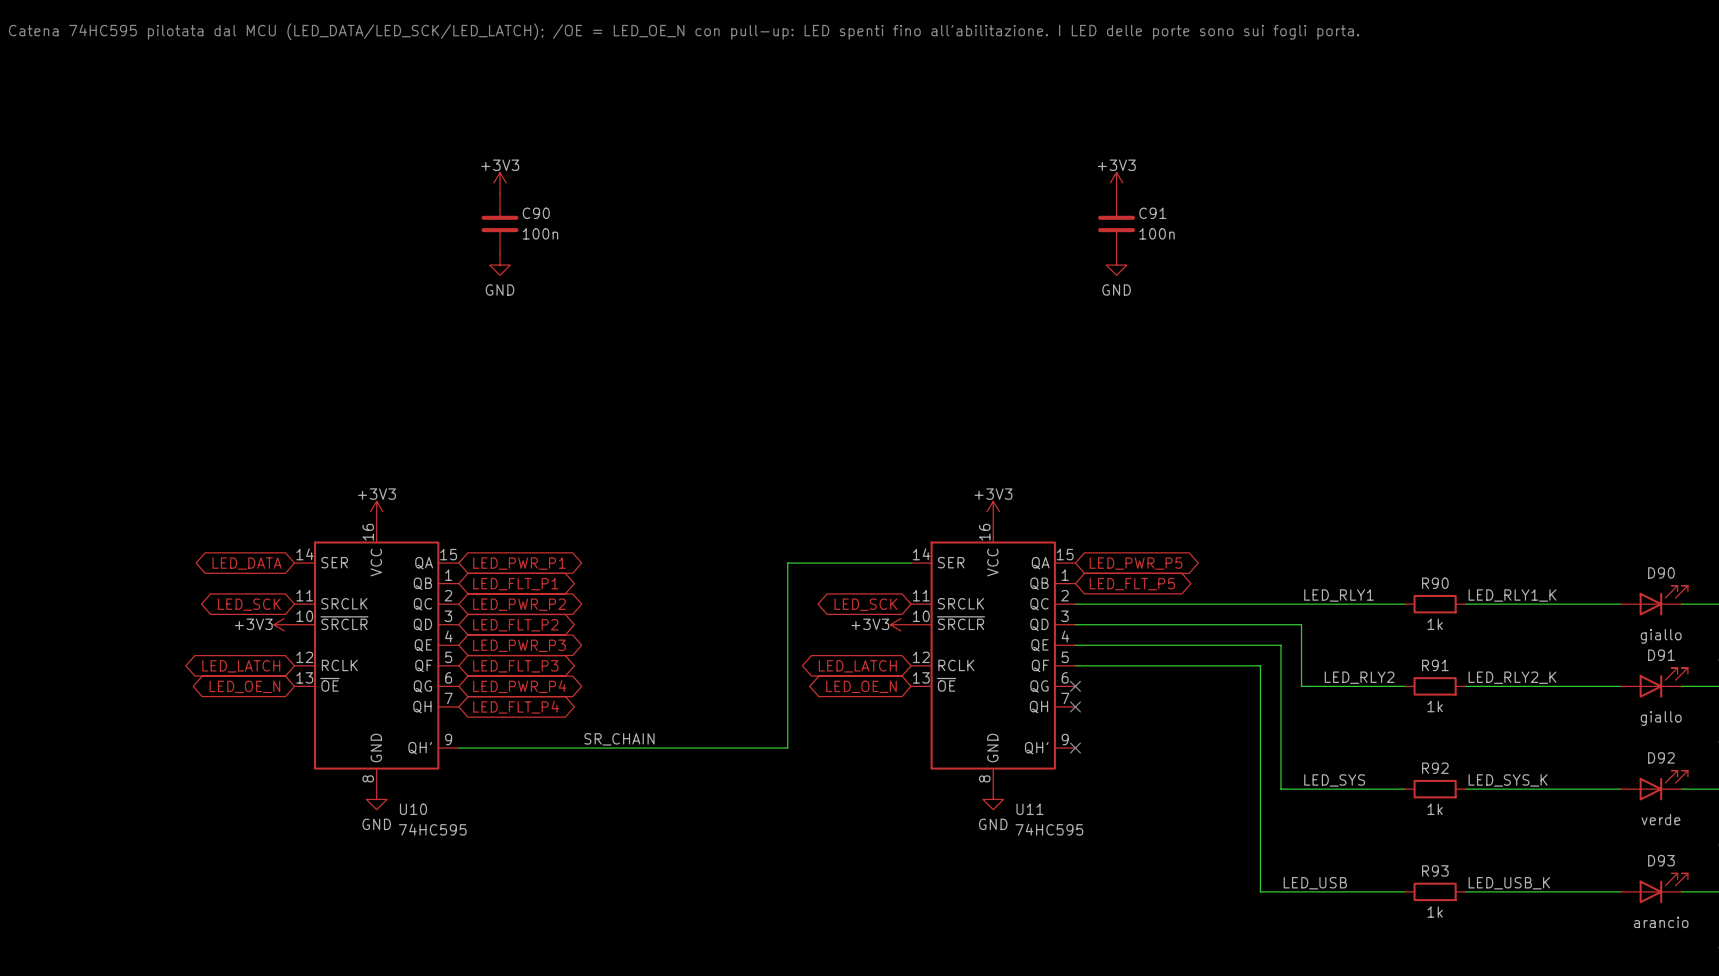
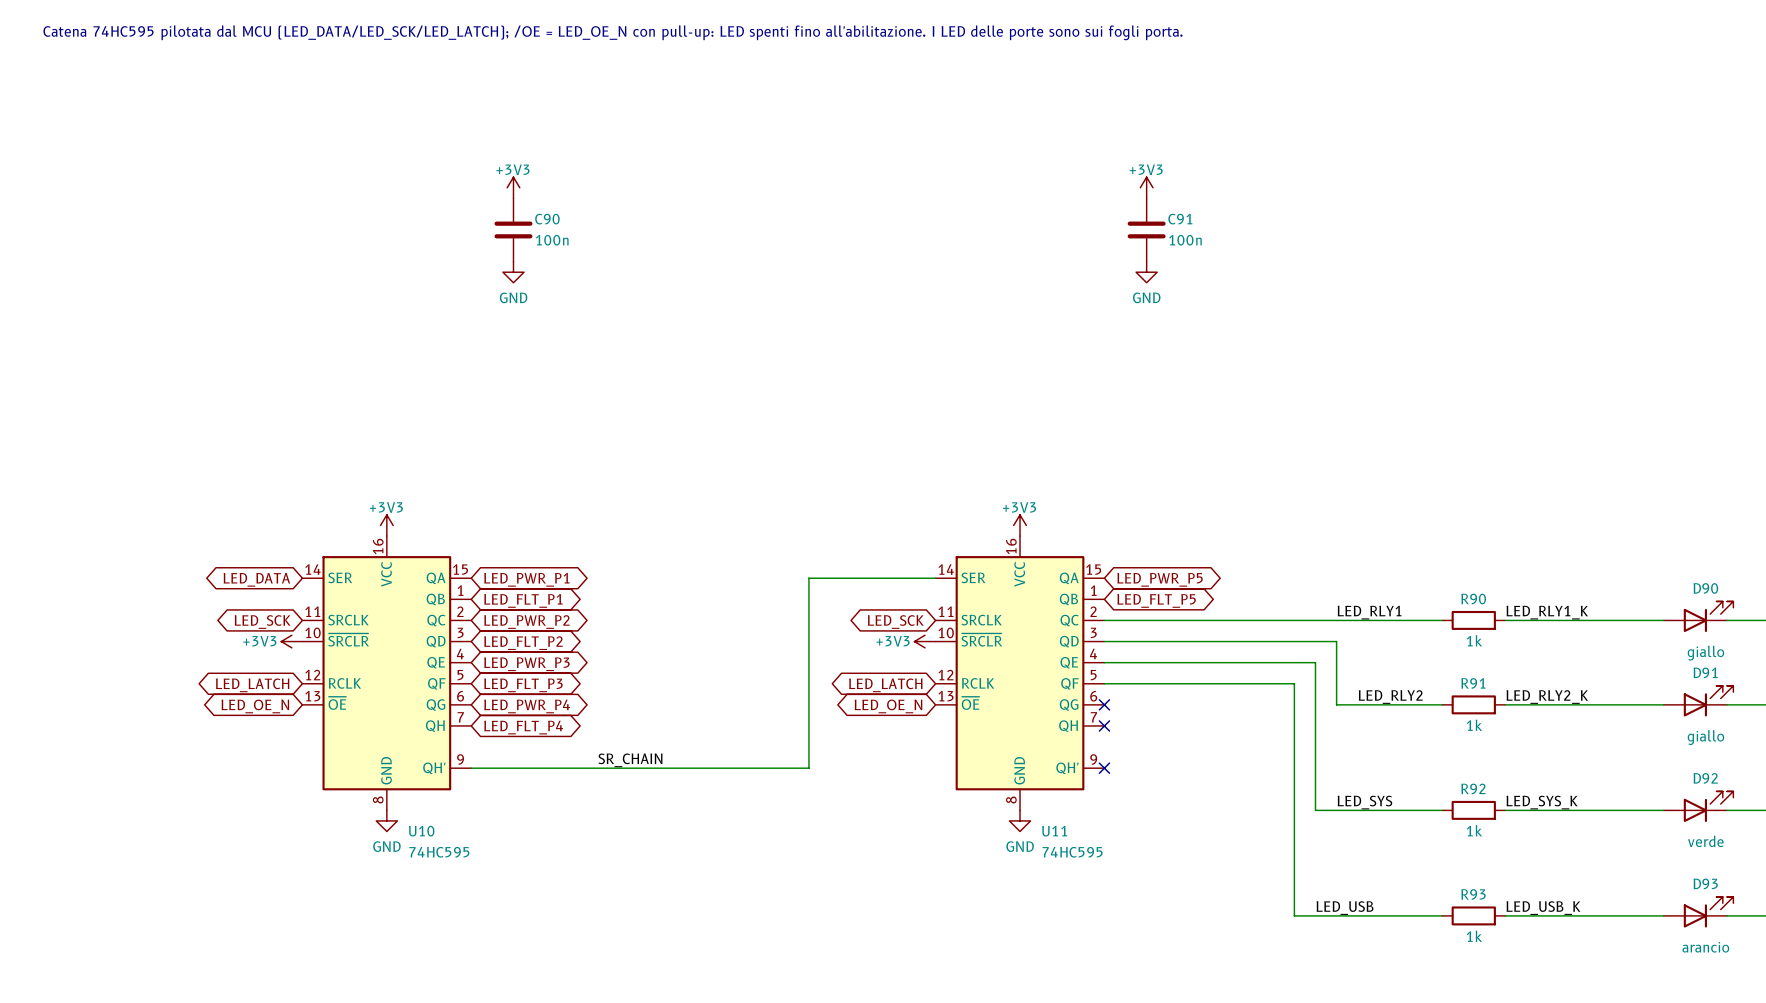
text position: Catena 74HC595 pilotata dal MCU (LED_DATA/LED_SCK/LED_LATCH); /OE = LED_OE_N con pull-up: LED spenti fino all'abilitazione. I LED delle porte sono sui fogli porta. (684, 31) -> Catena 74HC595 pilotata dal MCU (LED_DATA/LED_SCK/LED_LATCH); /OE = LED_OE_N con pull-up: LED spenti fino all'abilitazione. I LED delle porte sono sui fogli porta. (613, 32)

